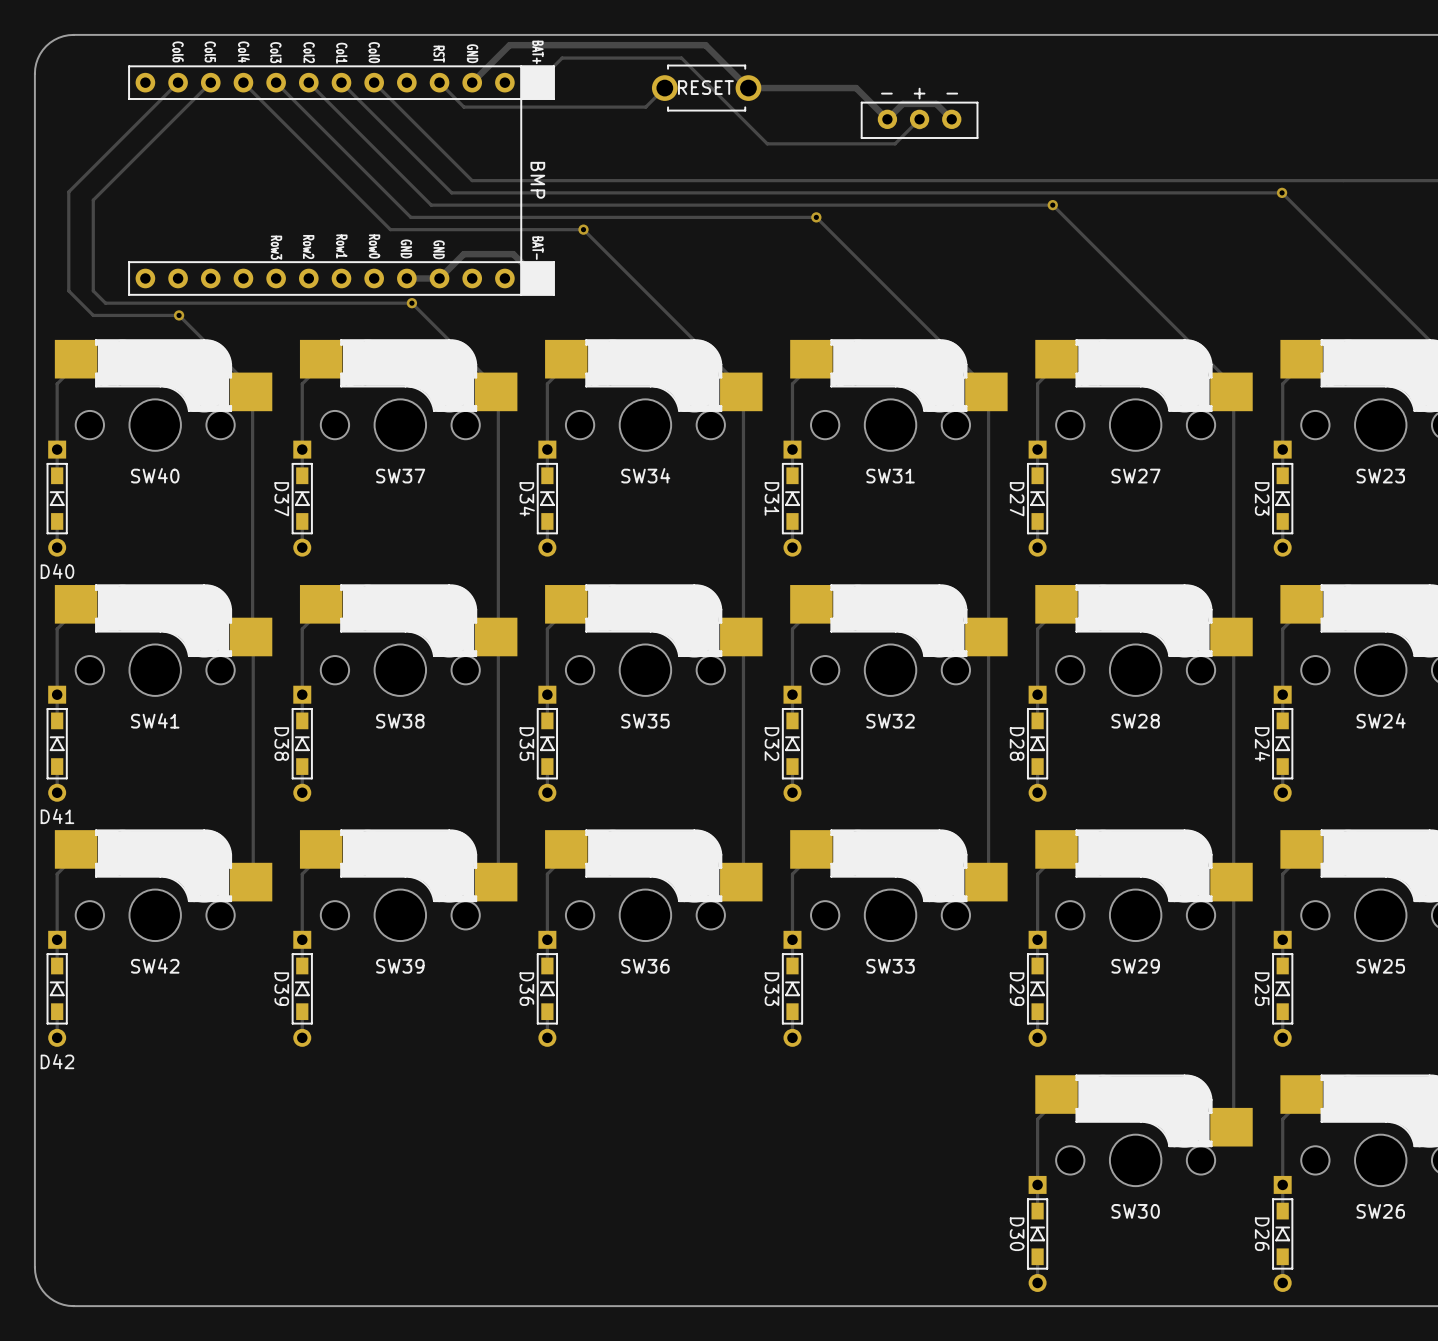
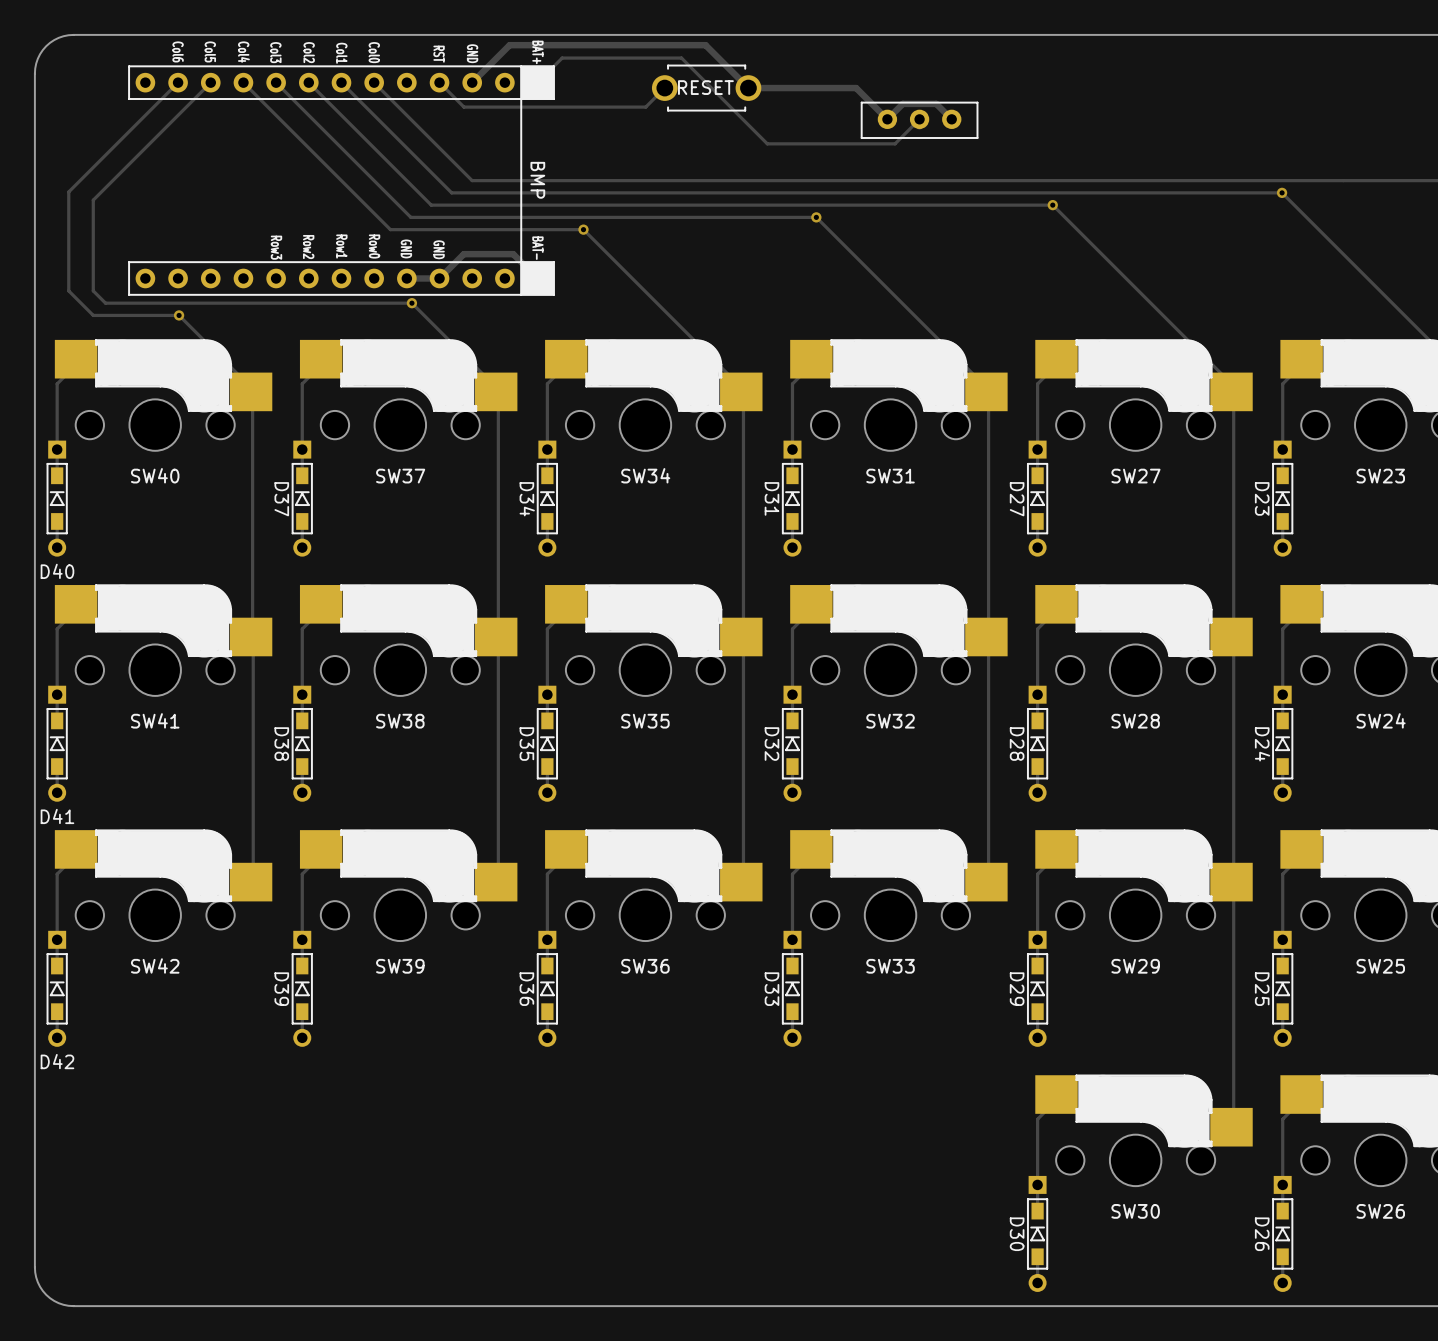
text: - (886, 93) -> none
text: + (919, 93) -> none
text: - (952, 93) -> none

